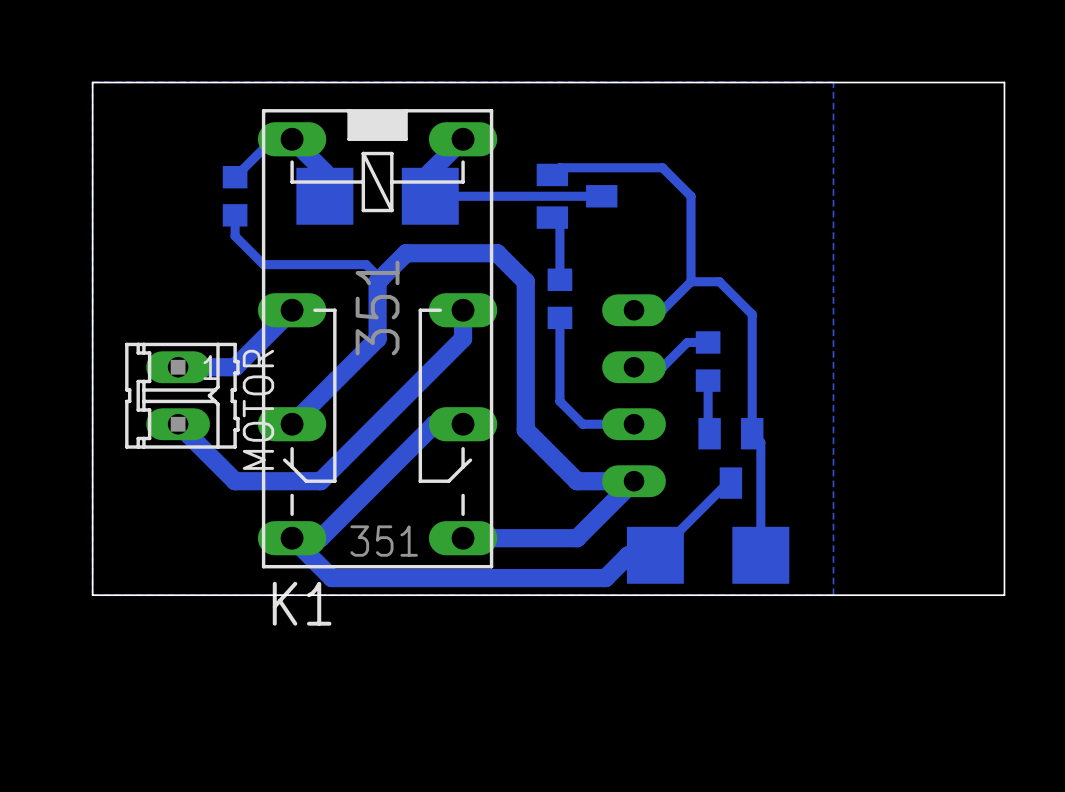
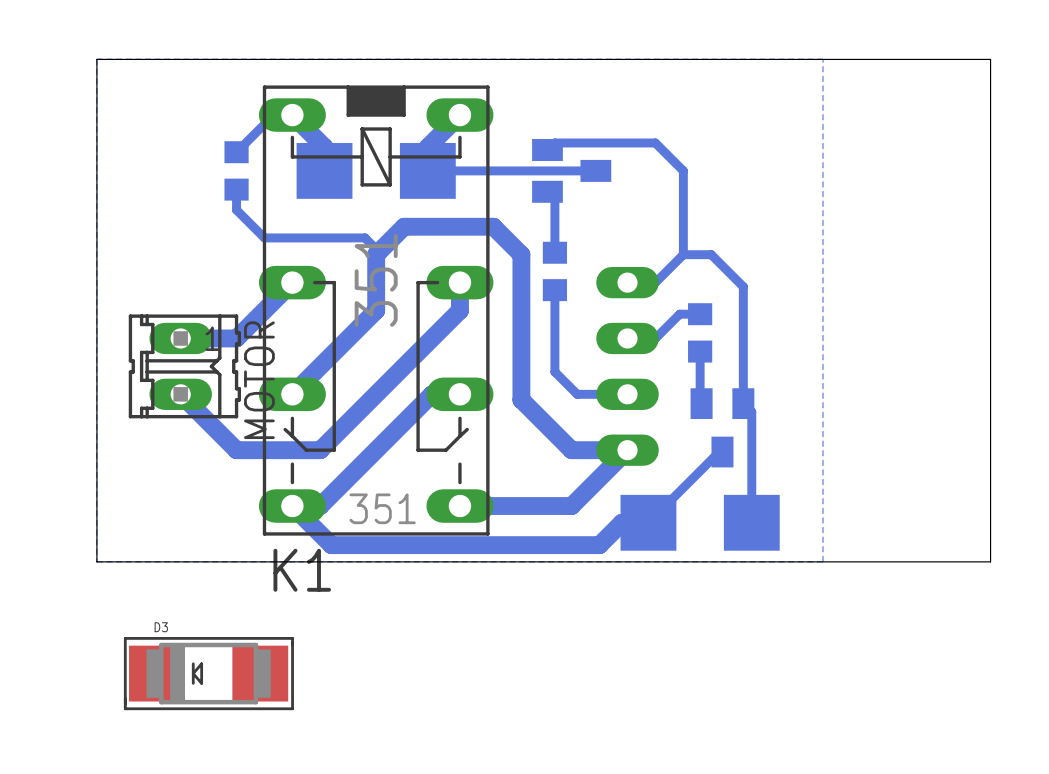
D3: none -> (208, 673)

